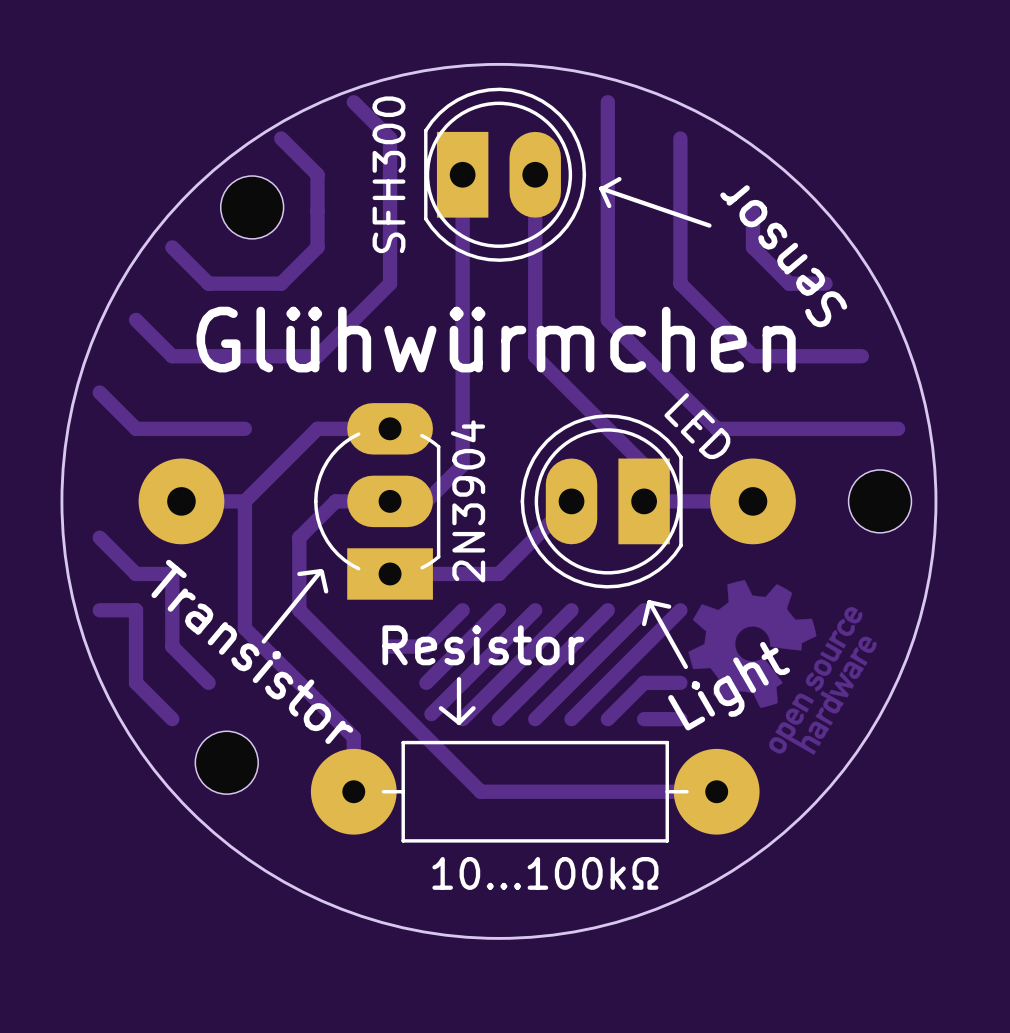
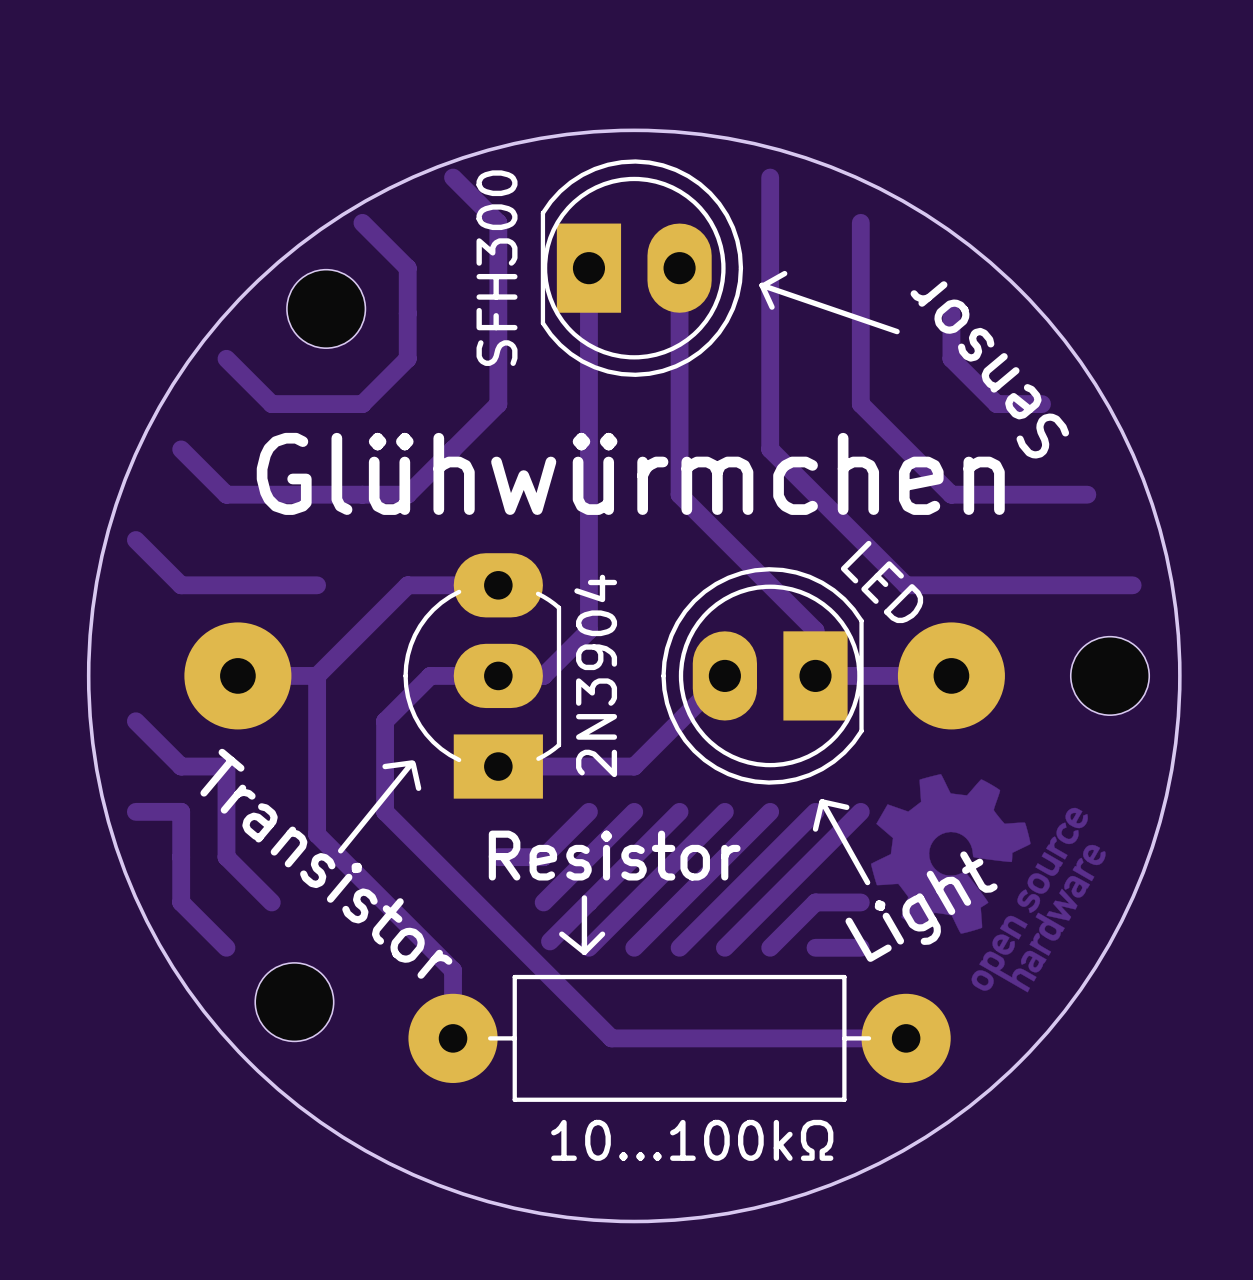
part footprint: [424, 87, 587, 262] -> [540, 159, 744, 377]
part footprint: [314, 403, 441, 600] -> [403, 553, 562, 799]
part footprint: [520, 414, 683, 589] -> [661, 567, 864, 785]
part footprint: [310, 740, 760, 843] -> [408, 974, 951, 1102]

